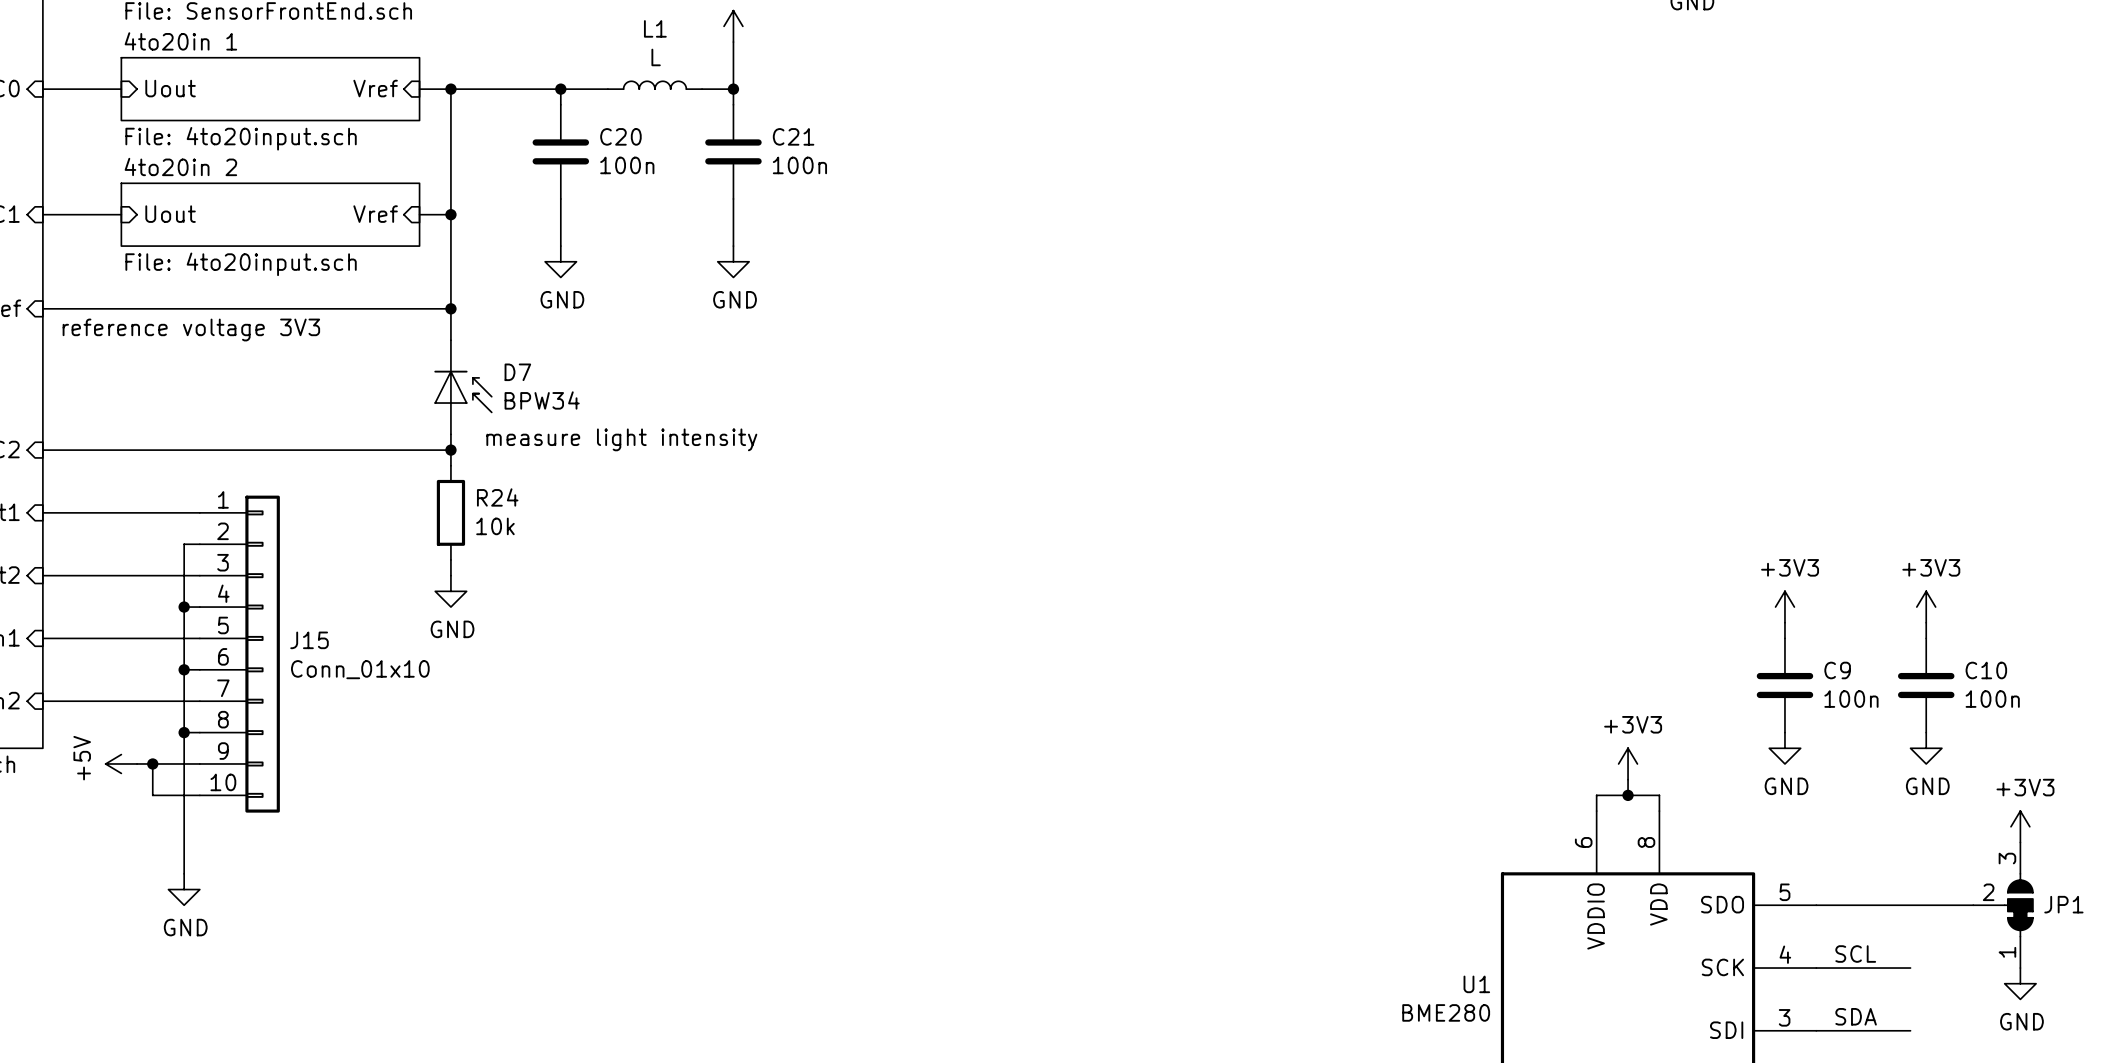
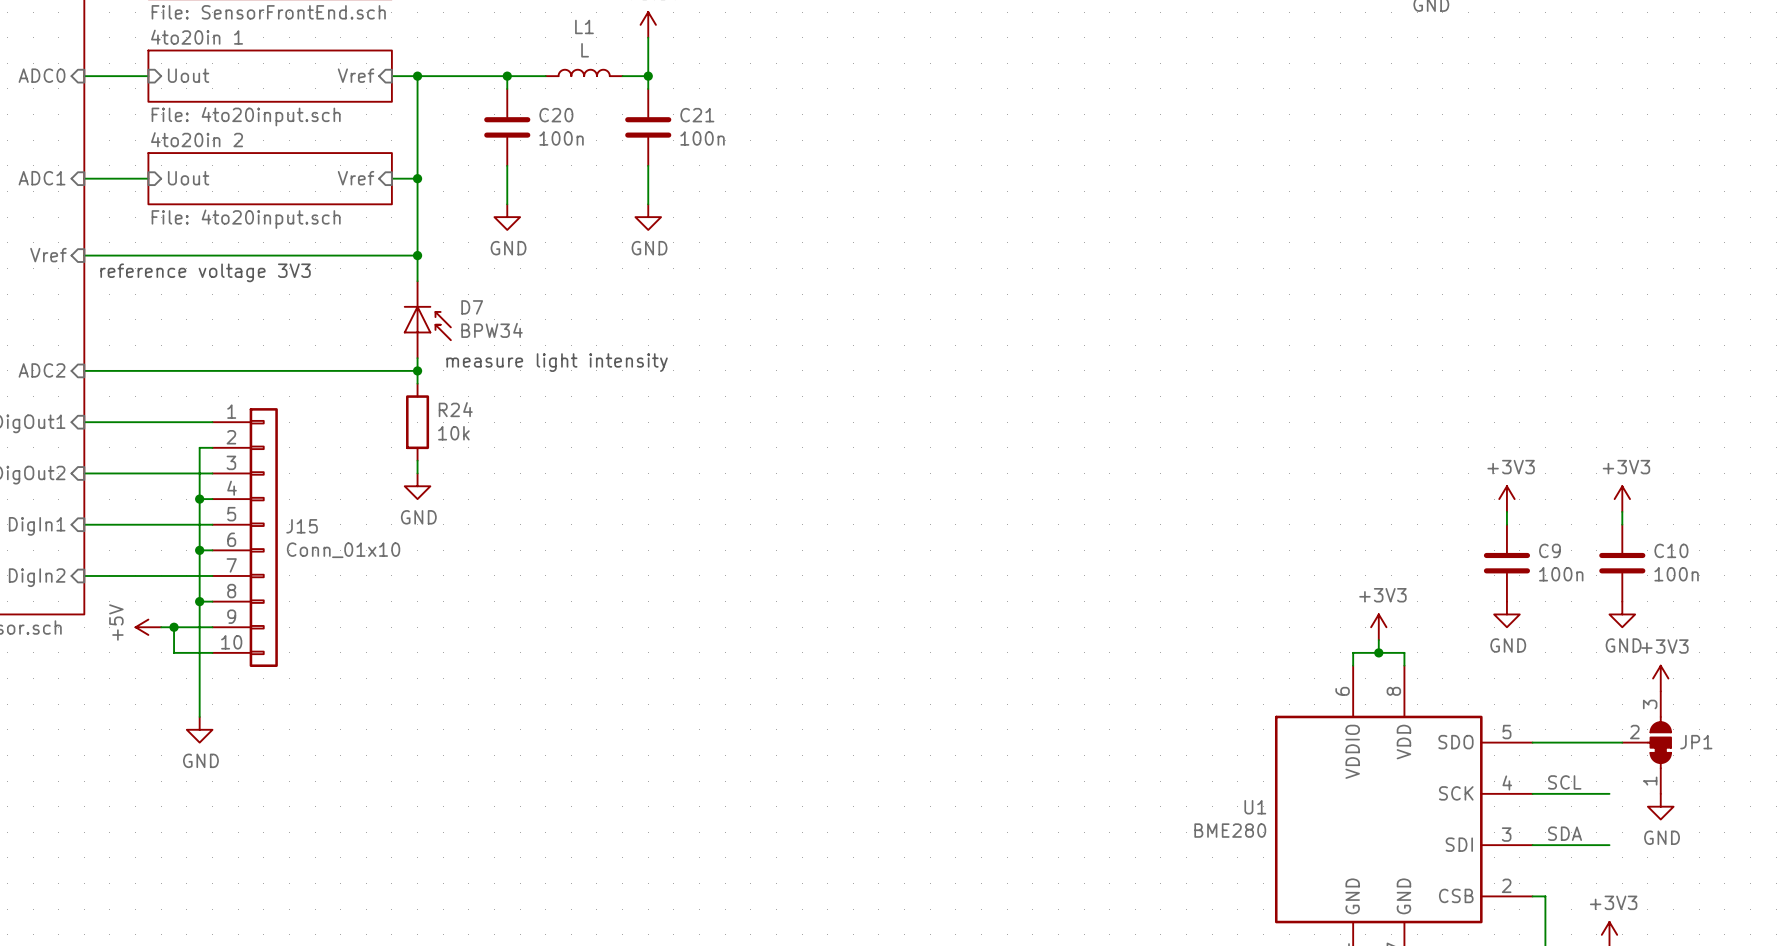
power symbol position: +3V3 (2020, 826) -> +3V3 (1660, 678)
JP1 position: (2003, 905) -> (1646, 742)
power symbol position: GND (2020, 983) -> GND (1660, 806)

